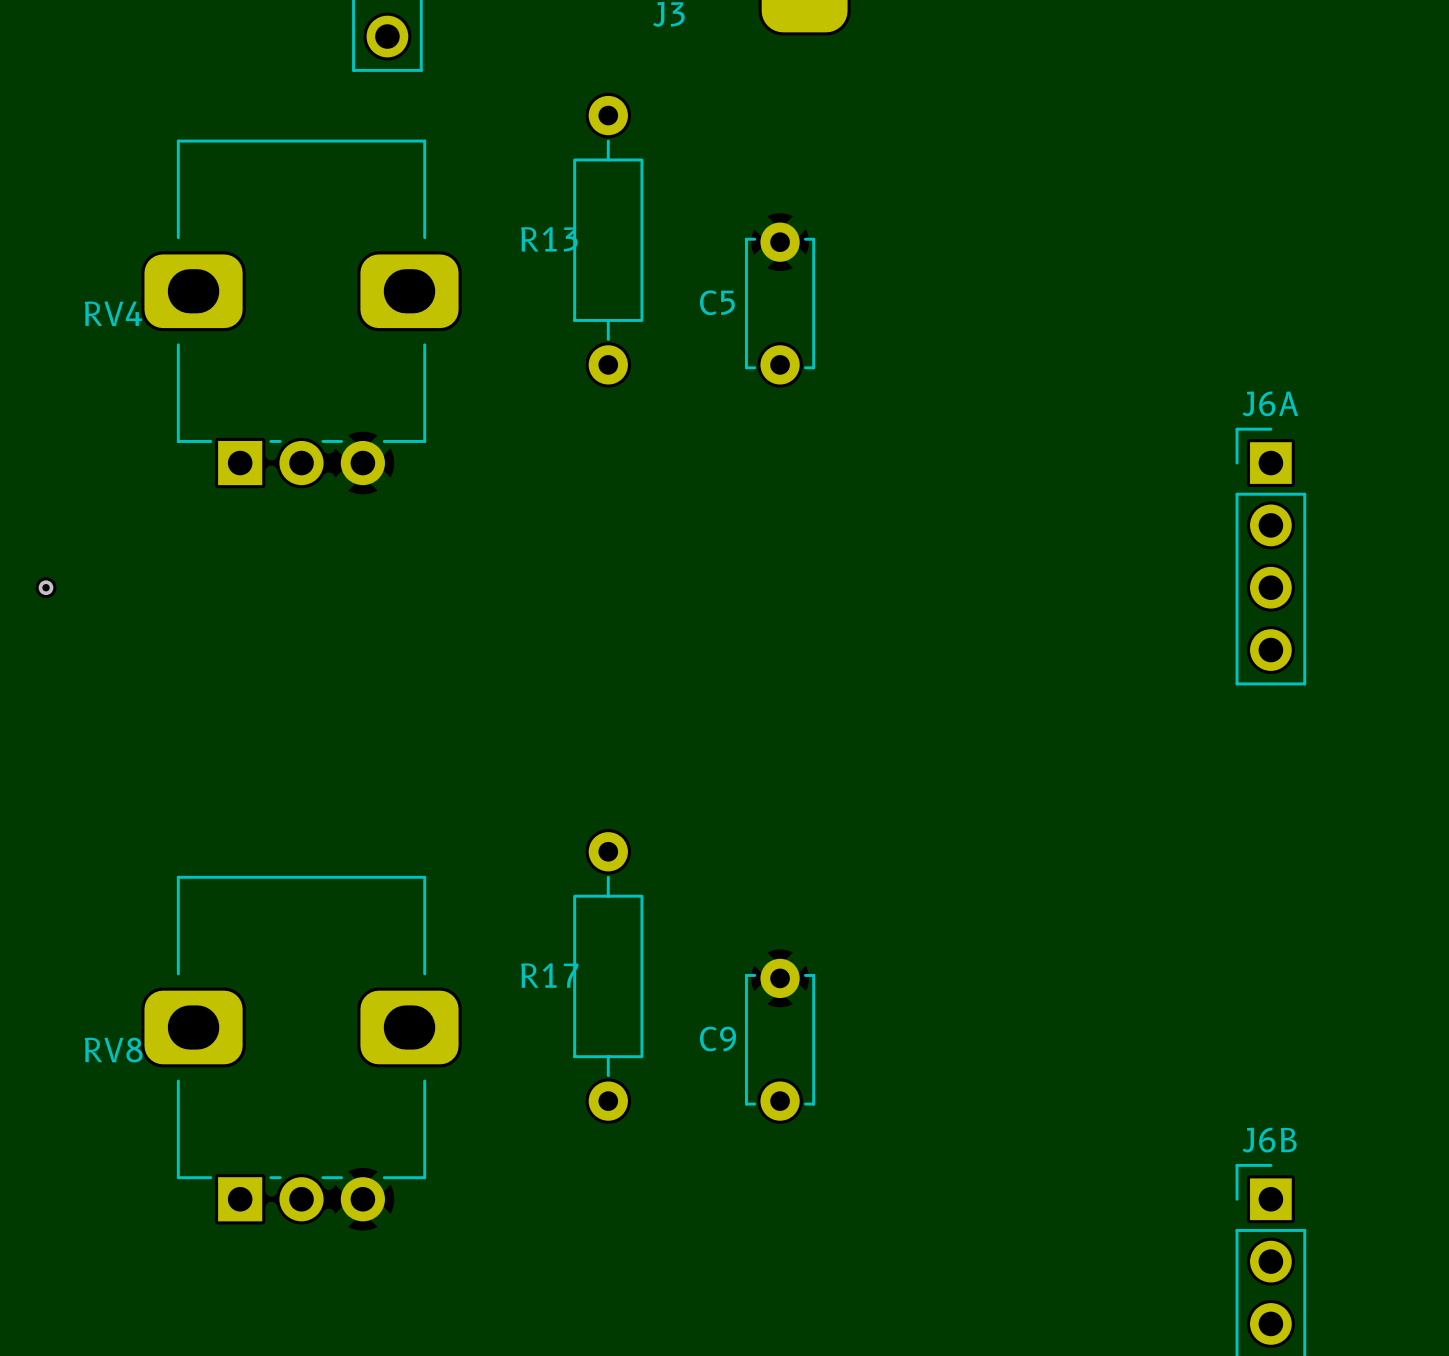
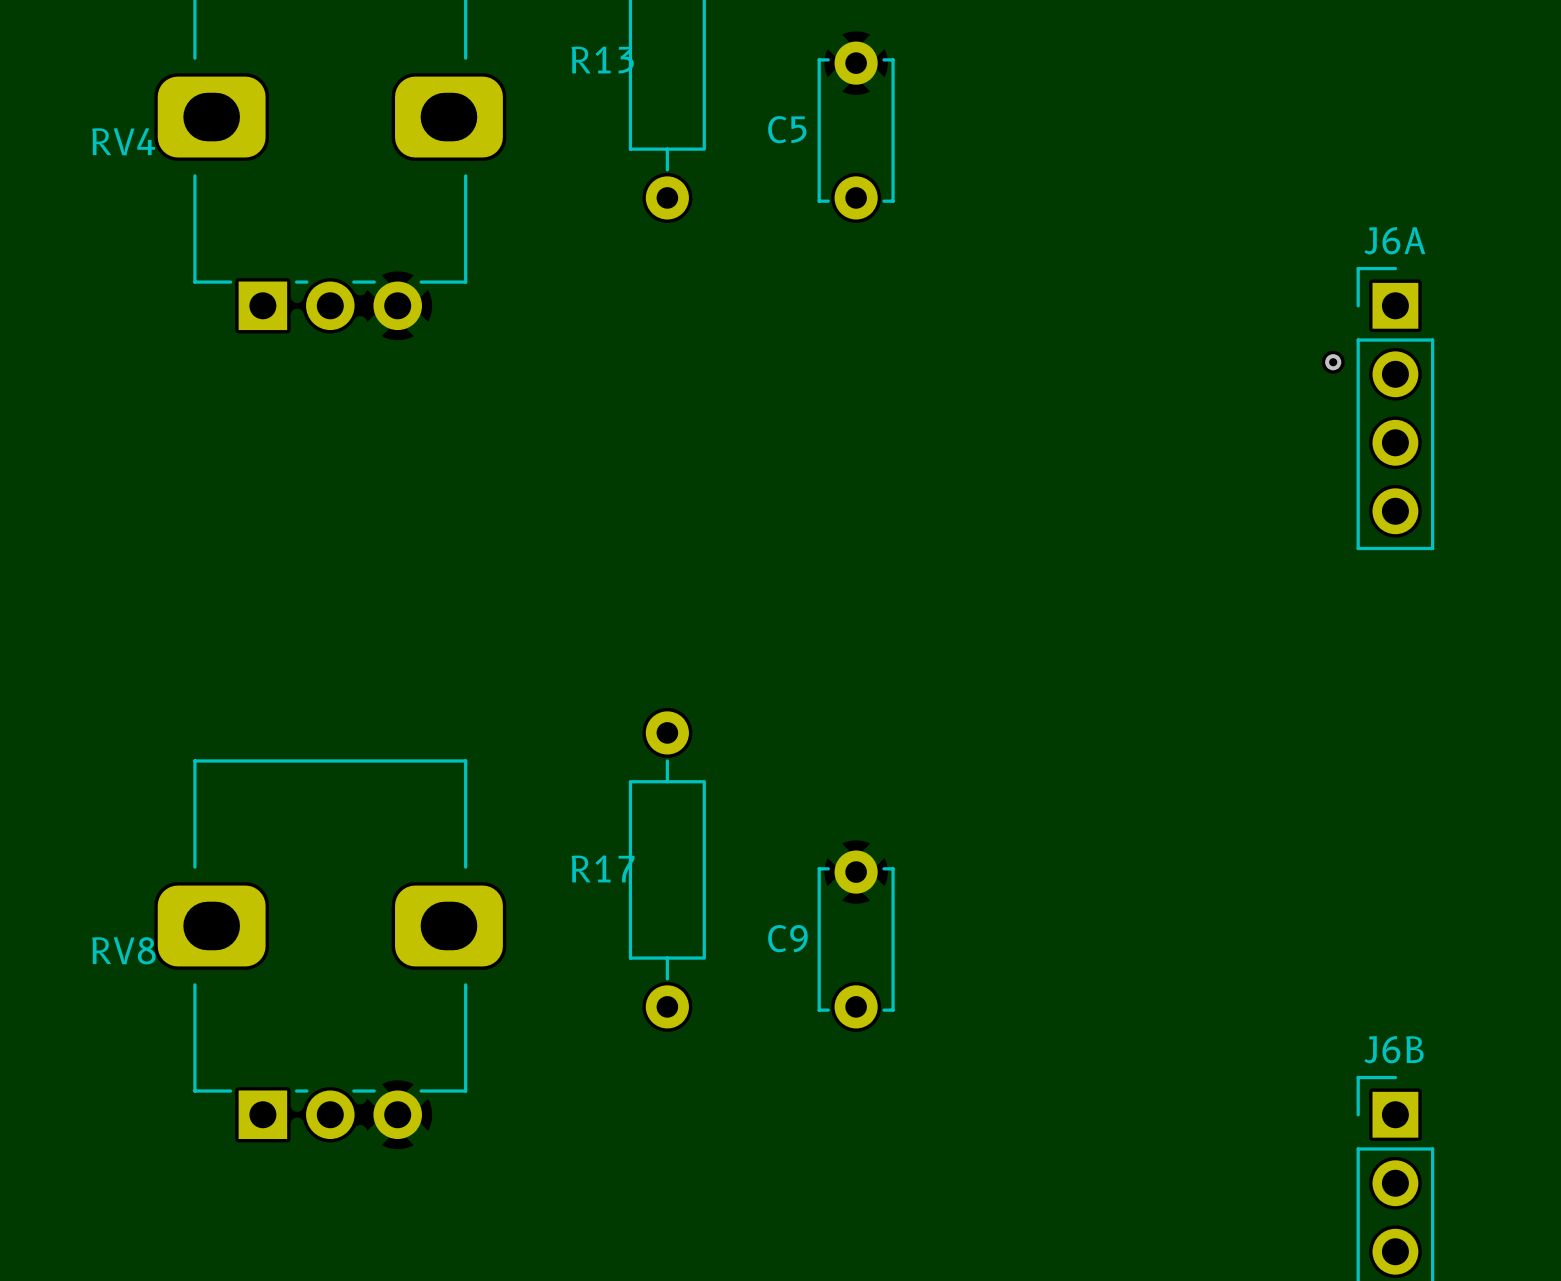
via: none -> (1333, 362)
via: (46, 587) -> none

